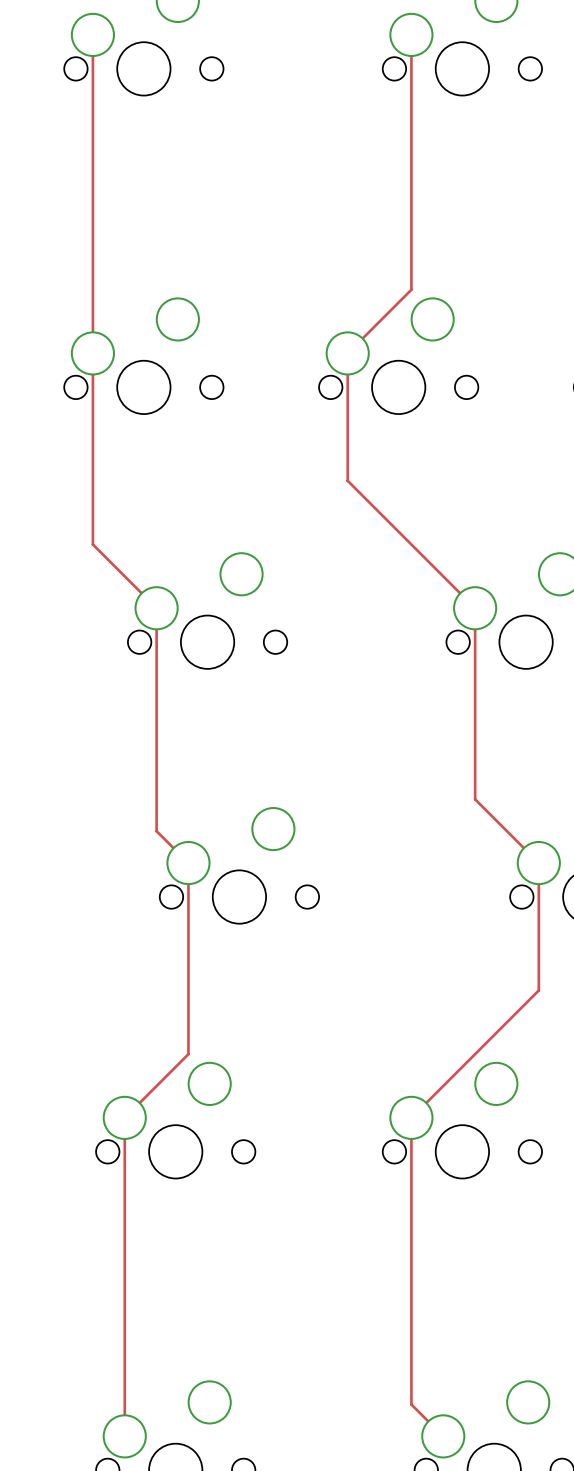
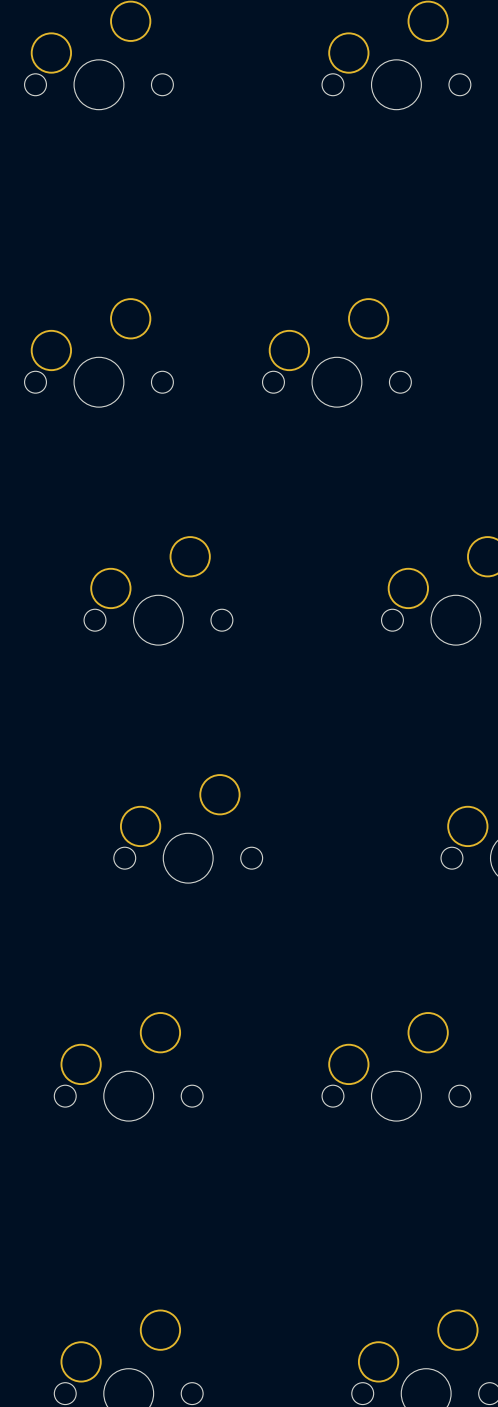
track: (92, 34) (92, 544) (156, 608) (156, 831) (188, 863) (188, 1054) (124, 1117) (124, 1436) -> none
track: (411, 34) (411, 289) (347, 353) (347, 480) (475, 608) (475, 799) (538, 863) (538, 990) (411, 1117) (411, 1404) (443, 1436) -> none

